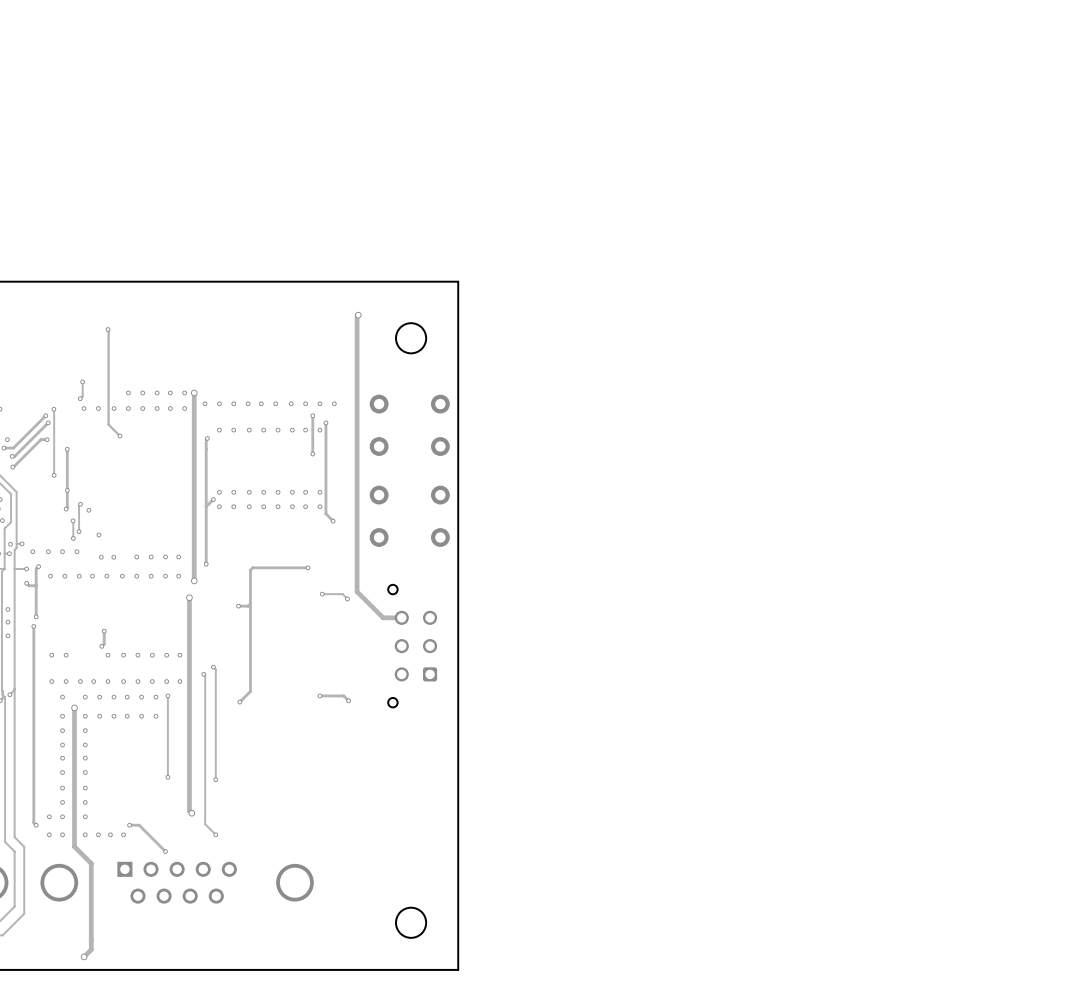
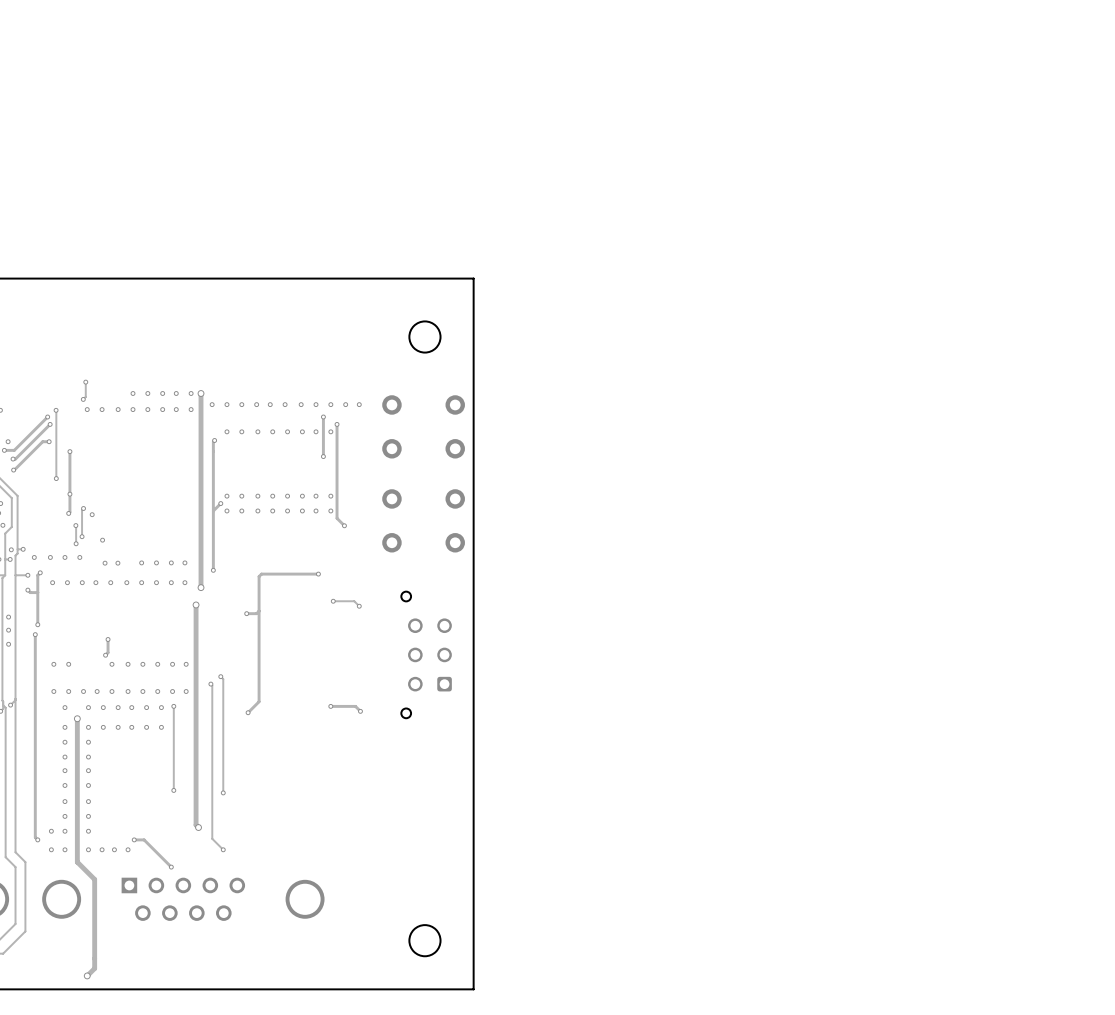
track: (358, 315) (357, 591) (383, 617) (401, 617) -> none
via: (358, 315) -> none
track: (108, 329) (108, 424) (120, 436) -> none
via: (108, 329) -> none
via: none -> (359, 404)
via: (120, 436) -> none

